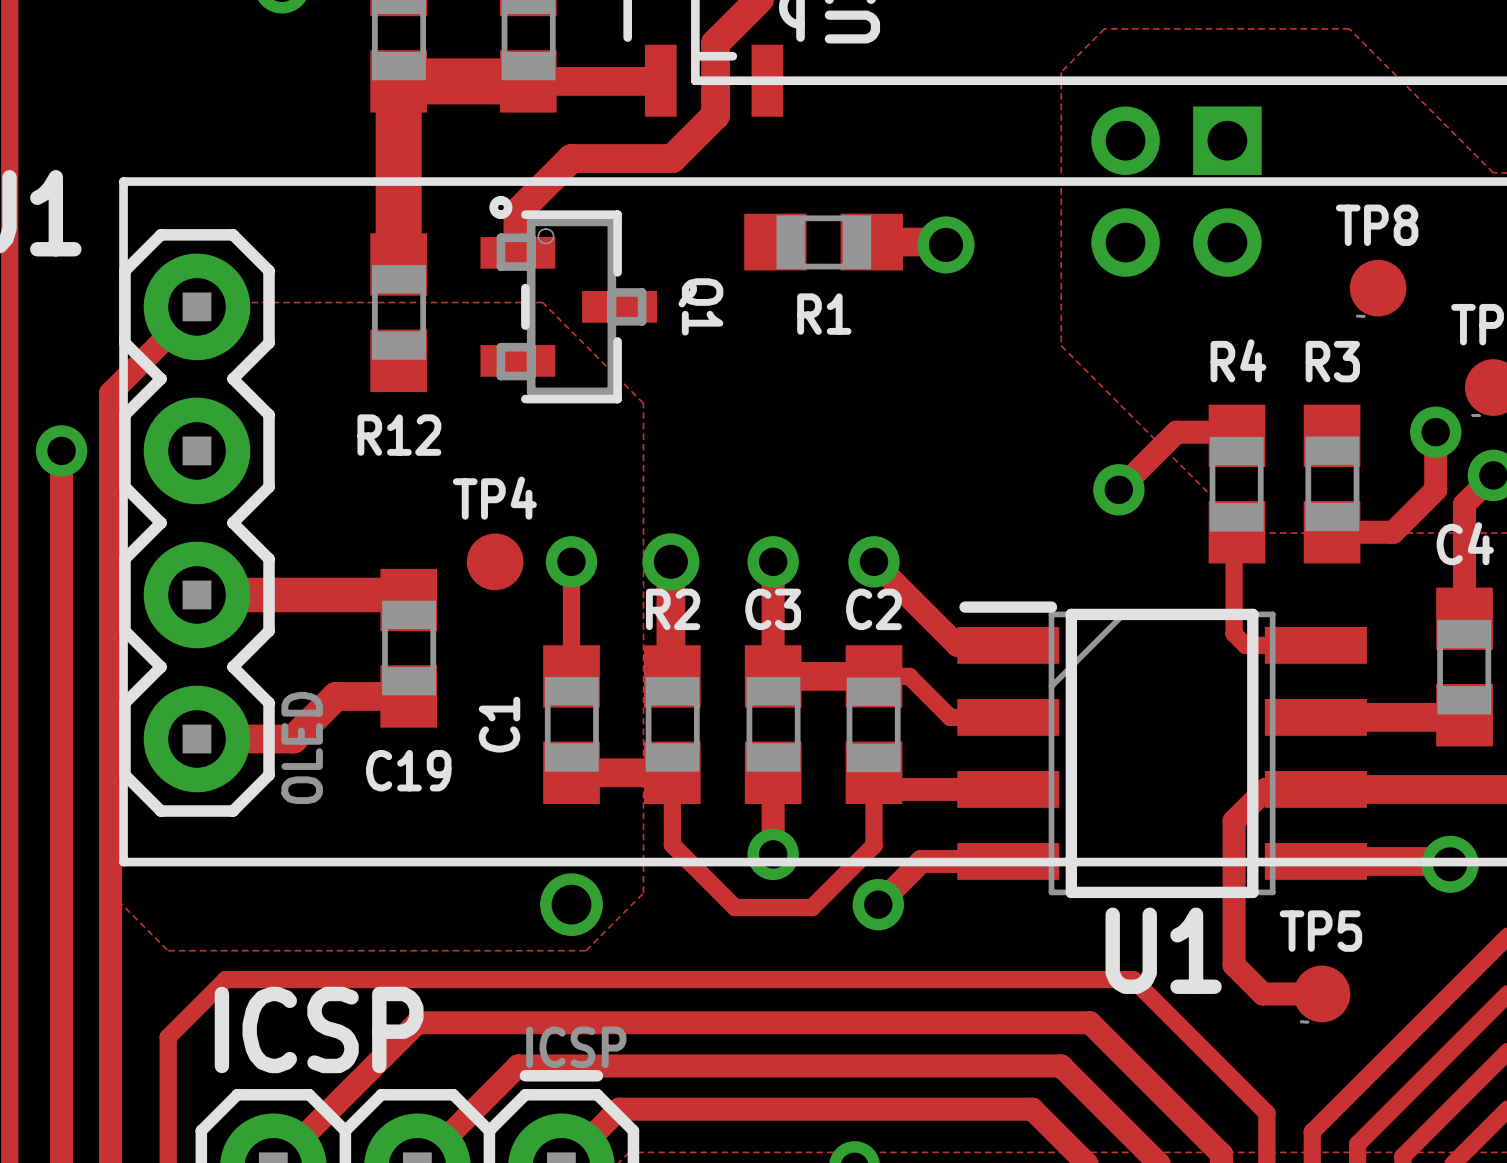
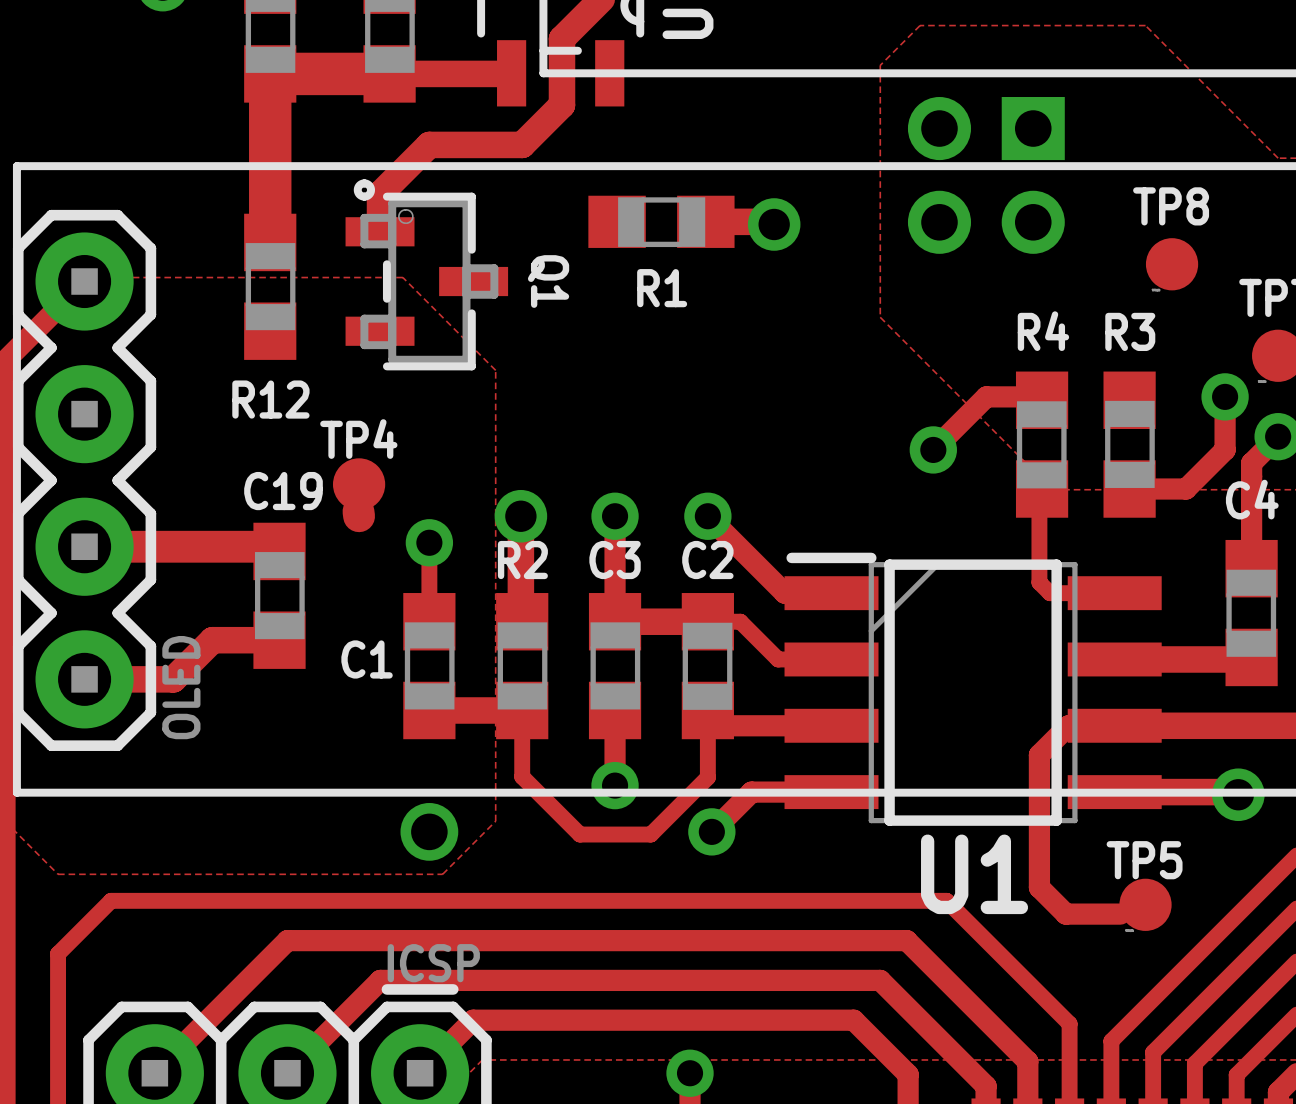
TP4 name position: TP4 (494, 498) -> TP4 (358, 439)
TP4 position: (495, 561) -> (359, 484)
via position: (571, 561) -> (429, 542)
C1 name rotation: 0° (499, 724) -> 90° clockwise (367, 659)
C19 name position: C19 (408, 770) -> C19 (283, 491)
TP5 name position: TP5 (1320, 931) -> TP5 (1144, 860)
TP5 position: (1321, 993) -> (1145, 904)
text: ICSP (319, 1029) -> none

